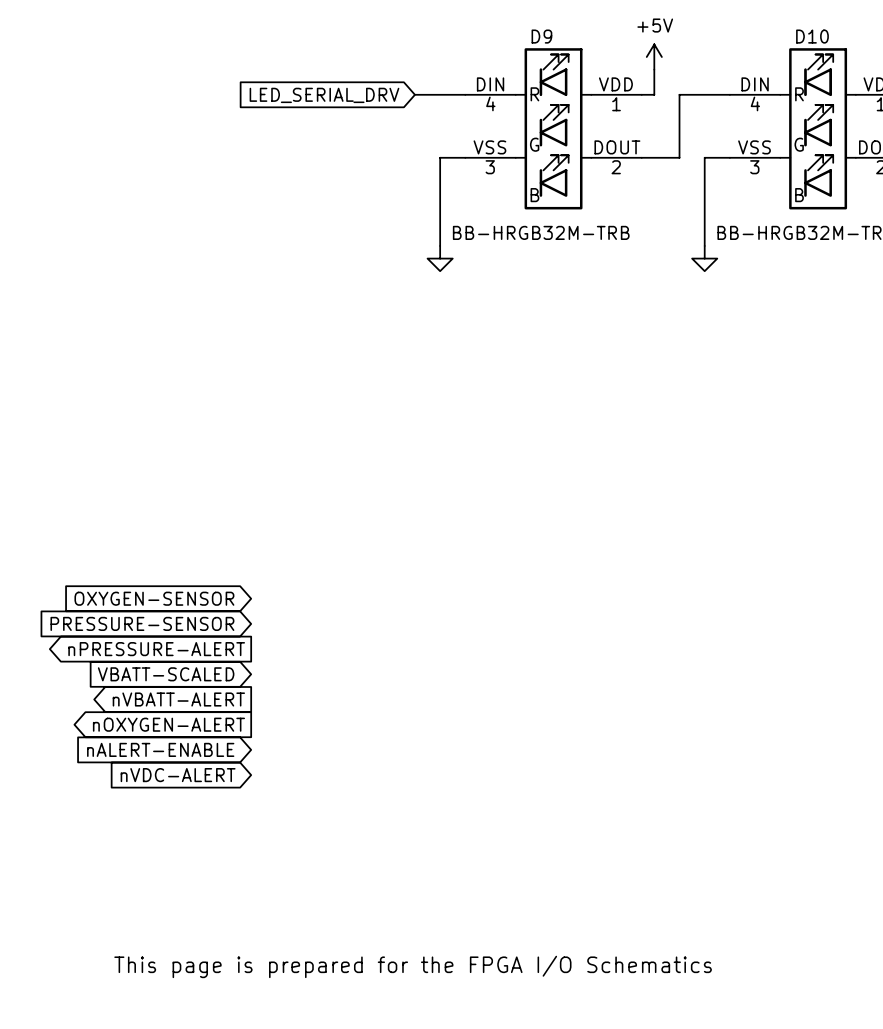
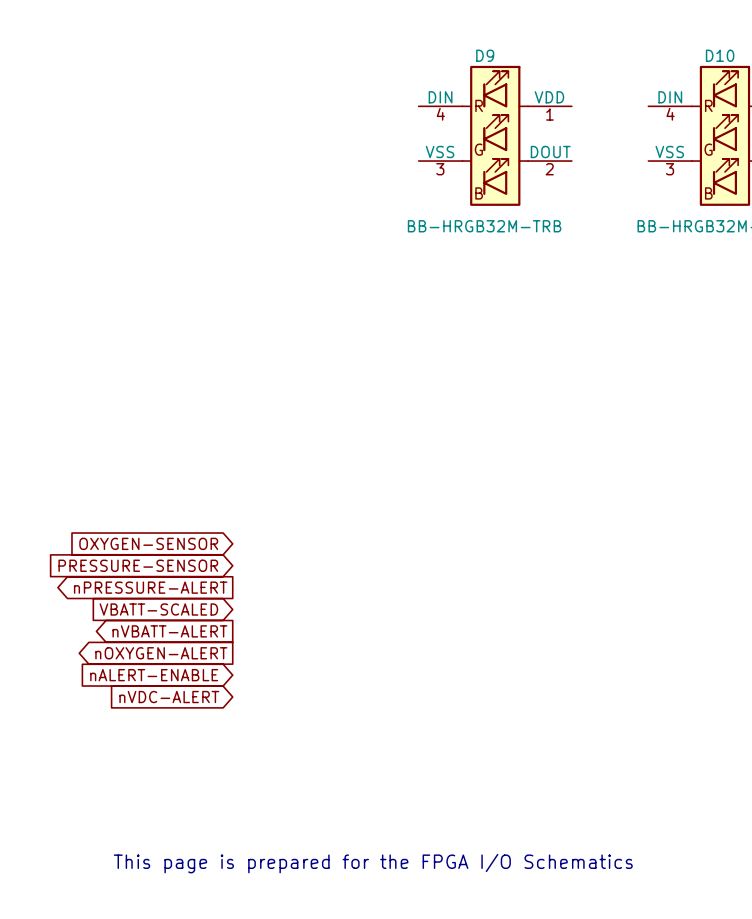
power symbol: +5V (654, 57) -> none
wire: (654, 69) (654, 94) (641, 94) -> none
wire: (414, 94) (465, 94) -> none
wire: (729, 94) (679, 94) (679, 157) (641, 157) -> none
global label: LED_SERIAL_DRV (324, 95) -> none
wire: (465, 157) (440, 157) (440, 245) -> none
wire: (729, 157) (704, 157) (704, 245) -> none
power symbol: (440, 258) -> none
power symbol: (704, 258) -> none

